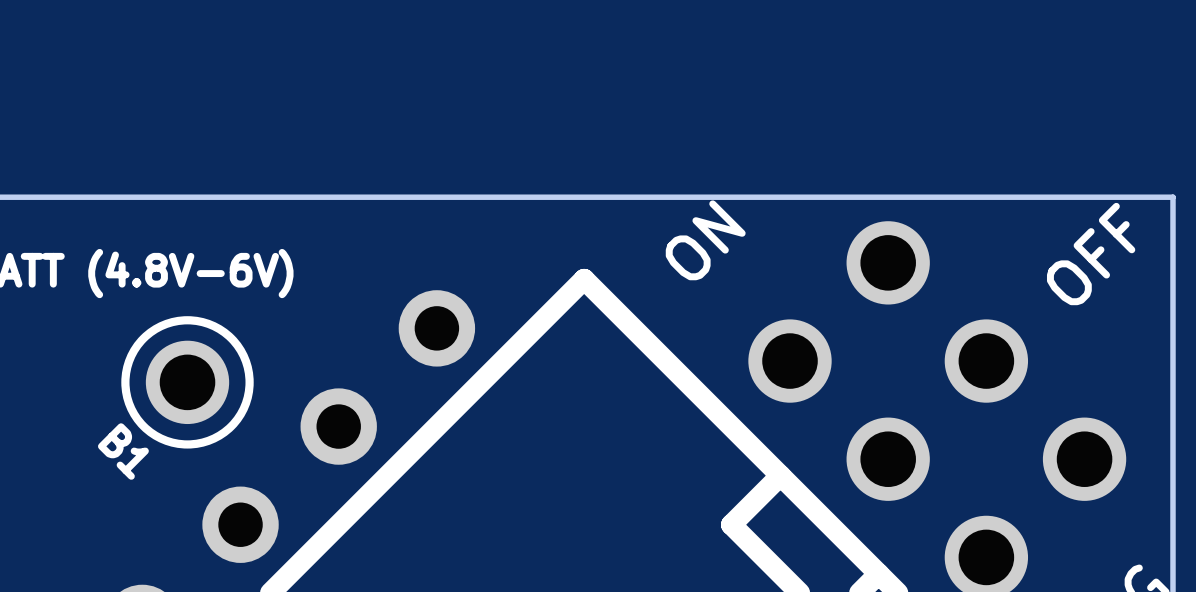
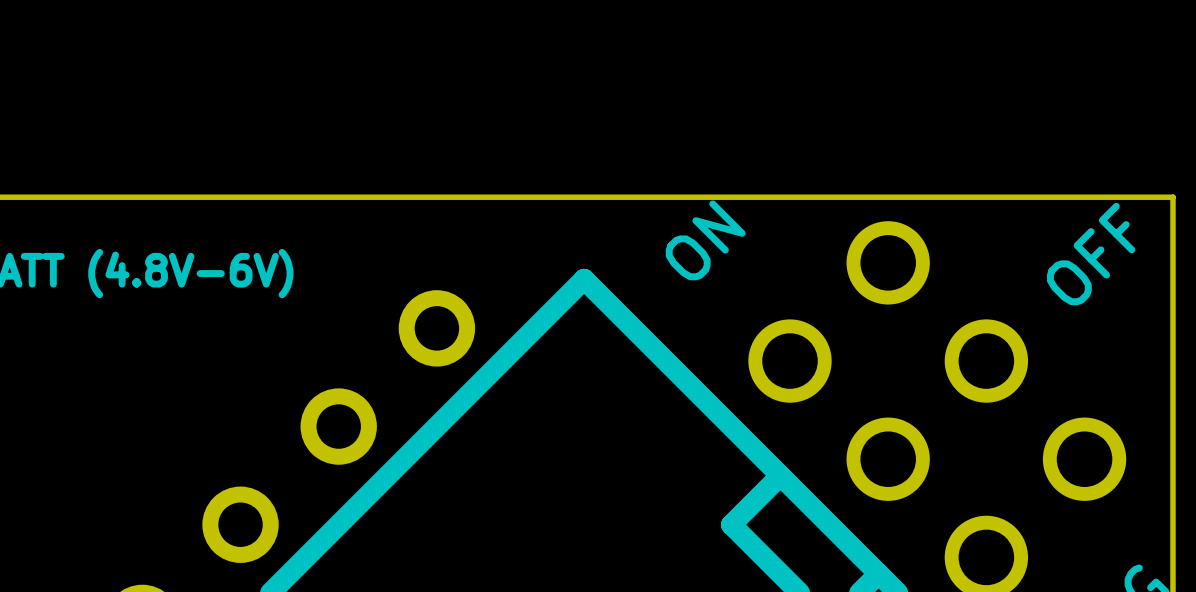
part: (187, 382) -> none
text: B1 (123, 451) -> none

